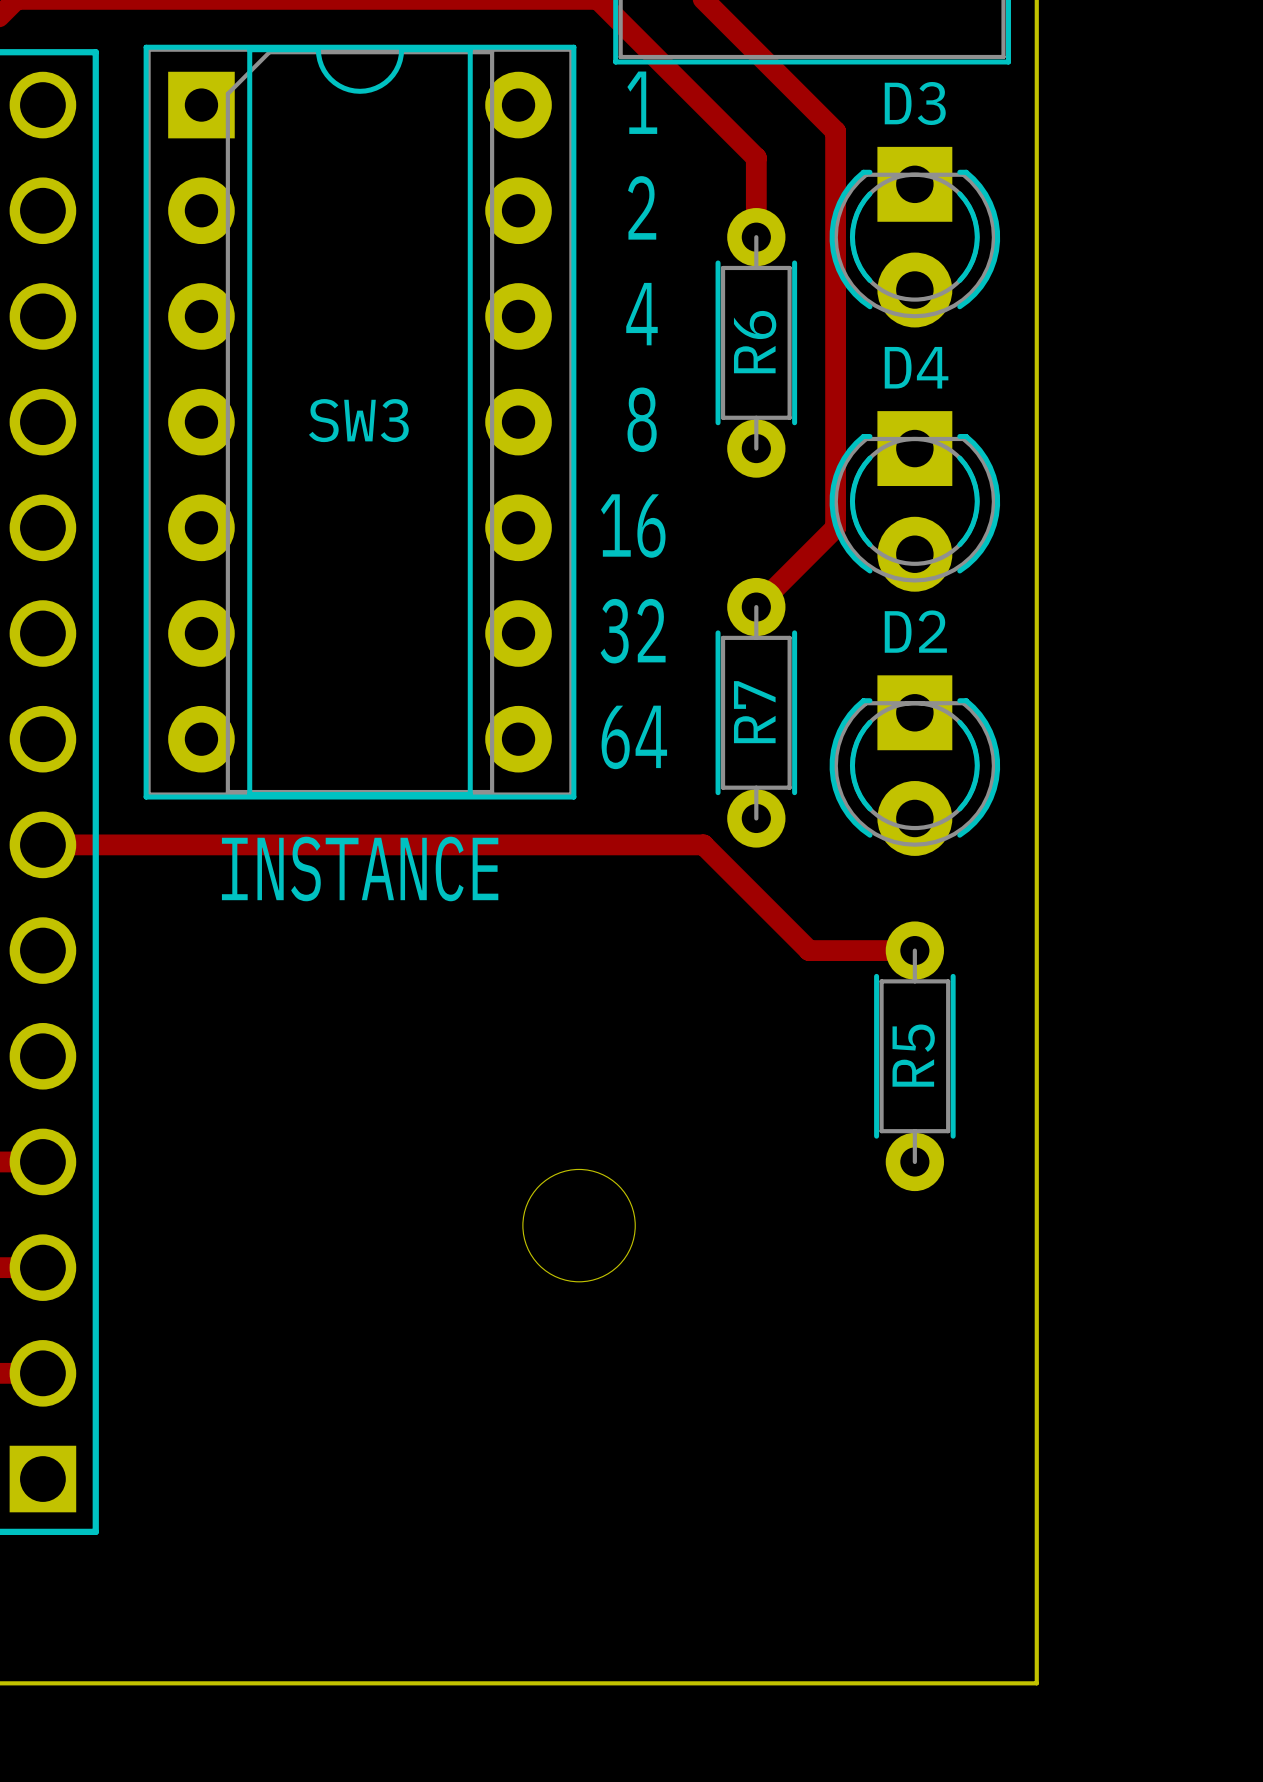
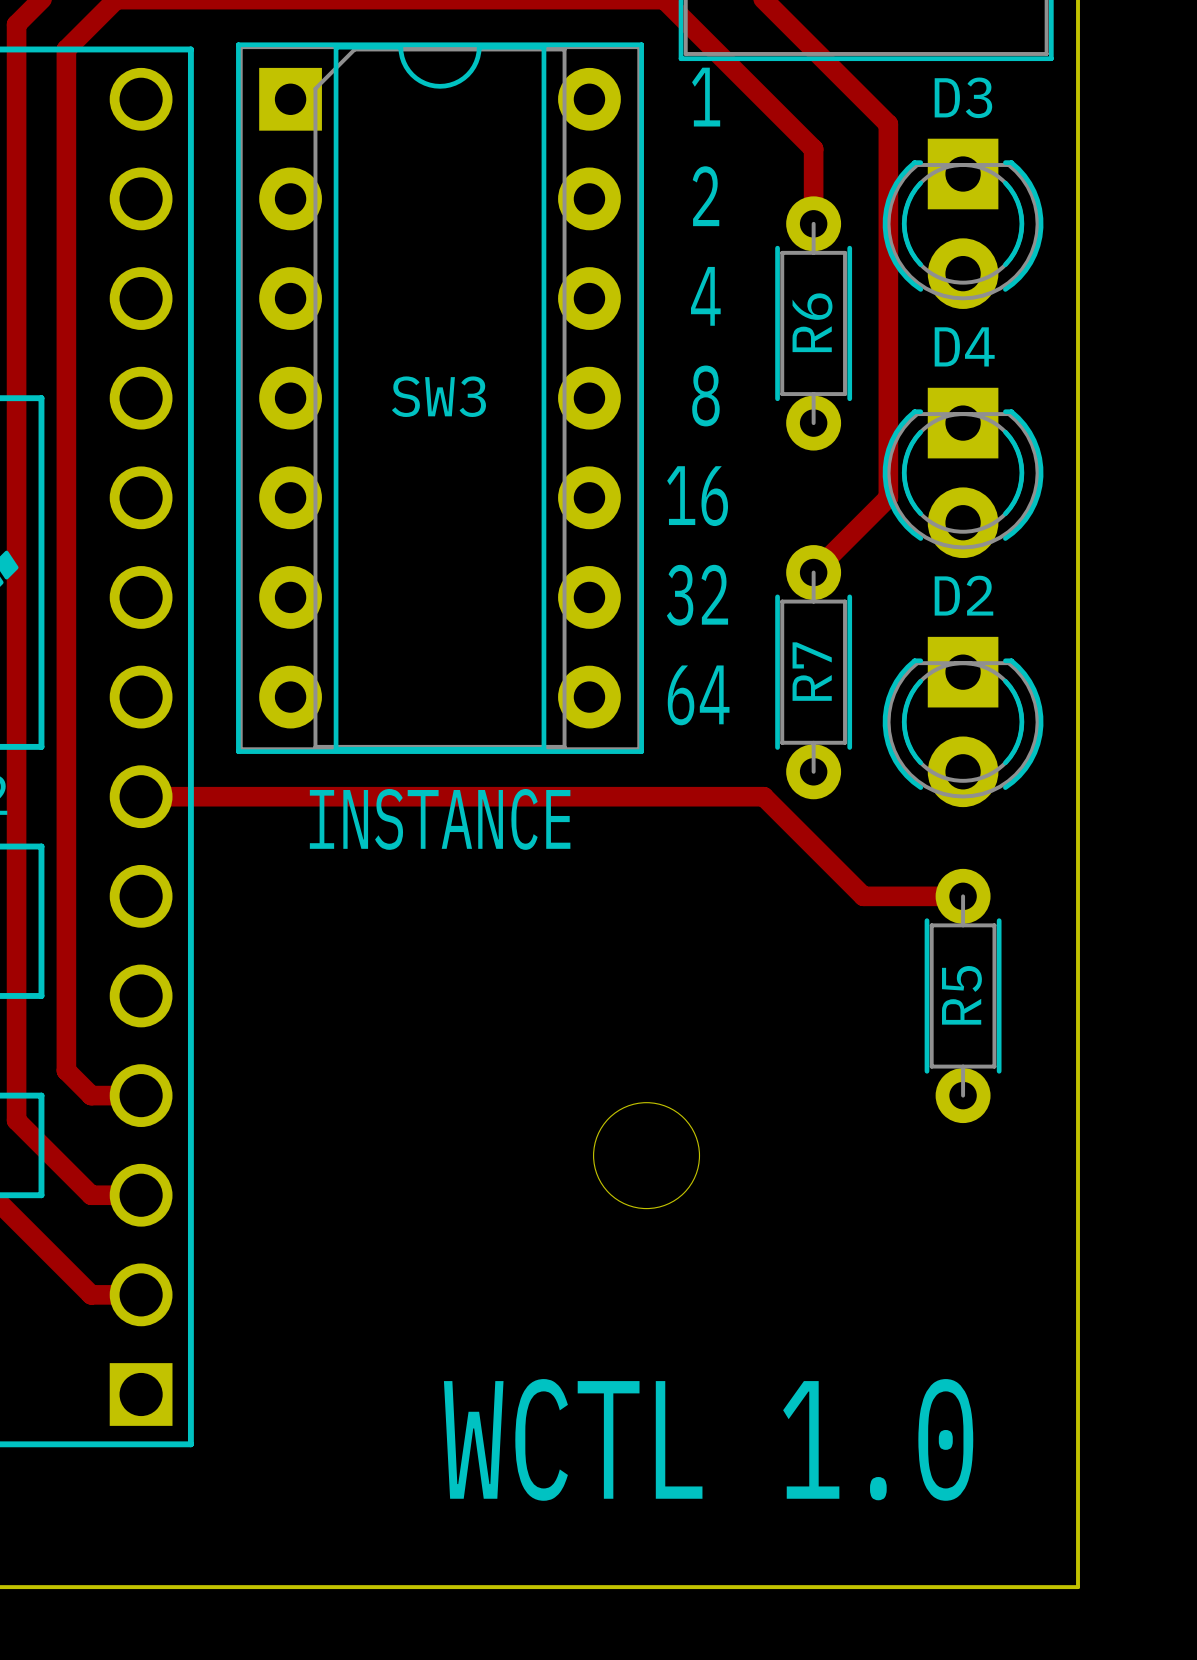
text: none -> WCTL 1.0 (708, 1439)

